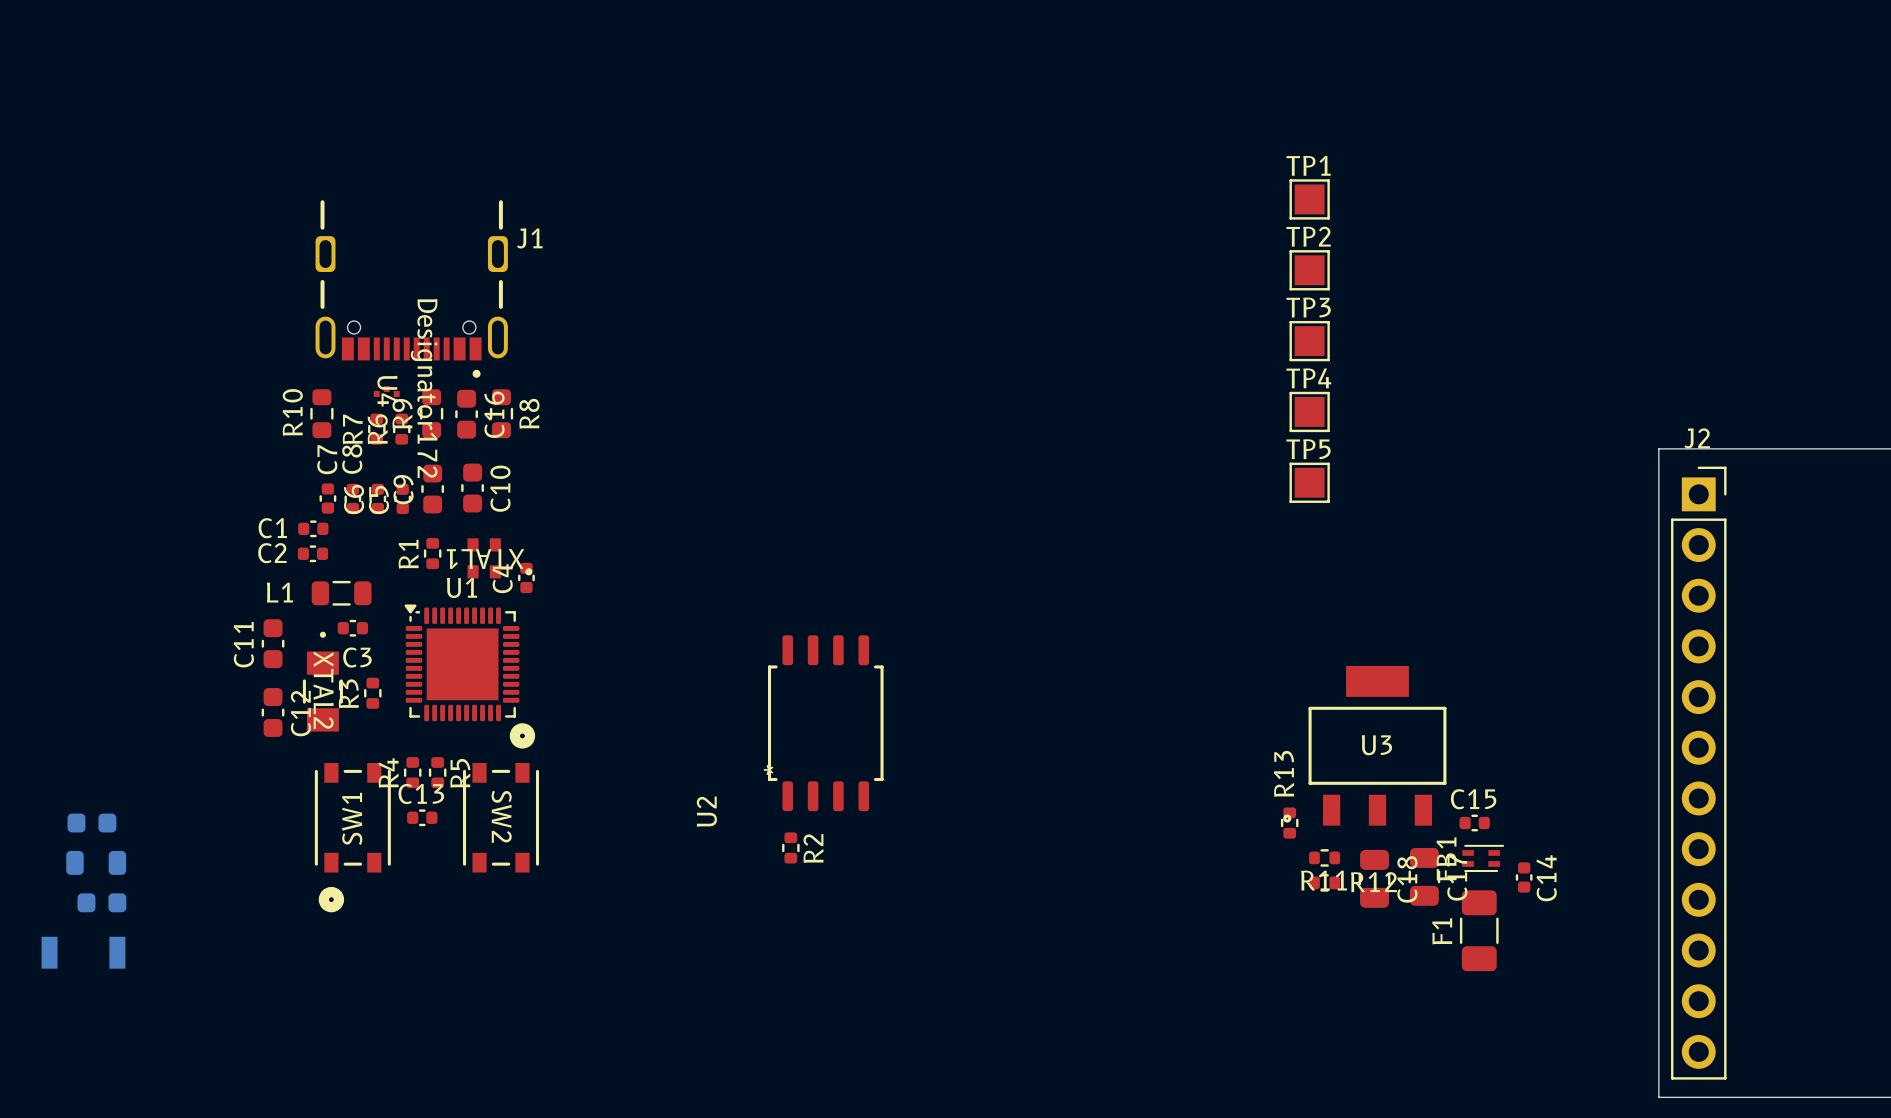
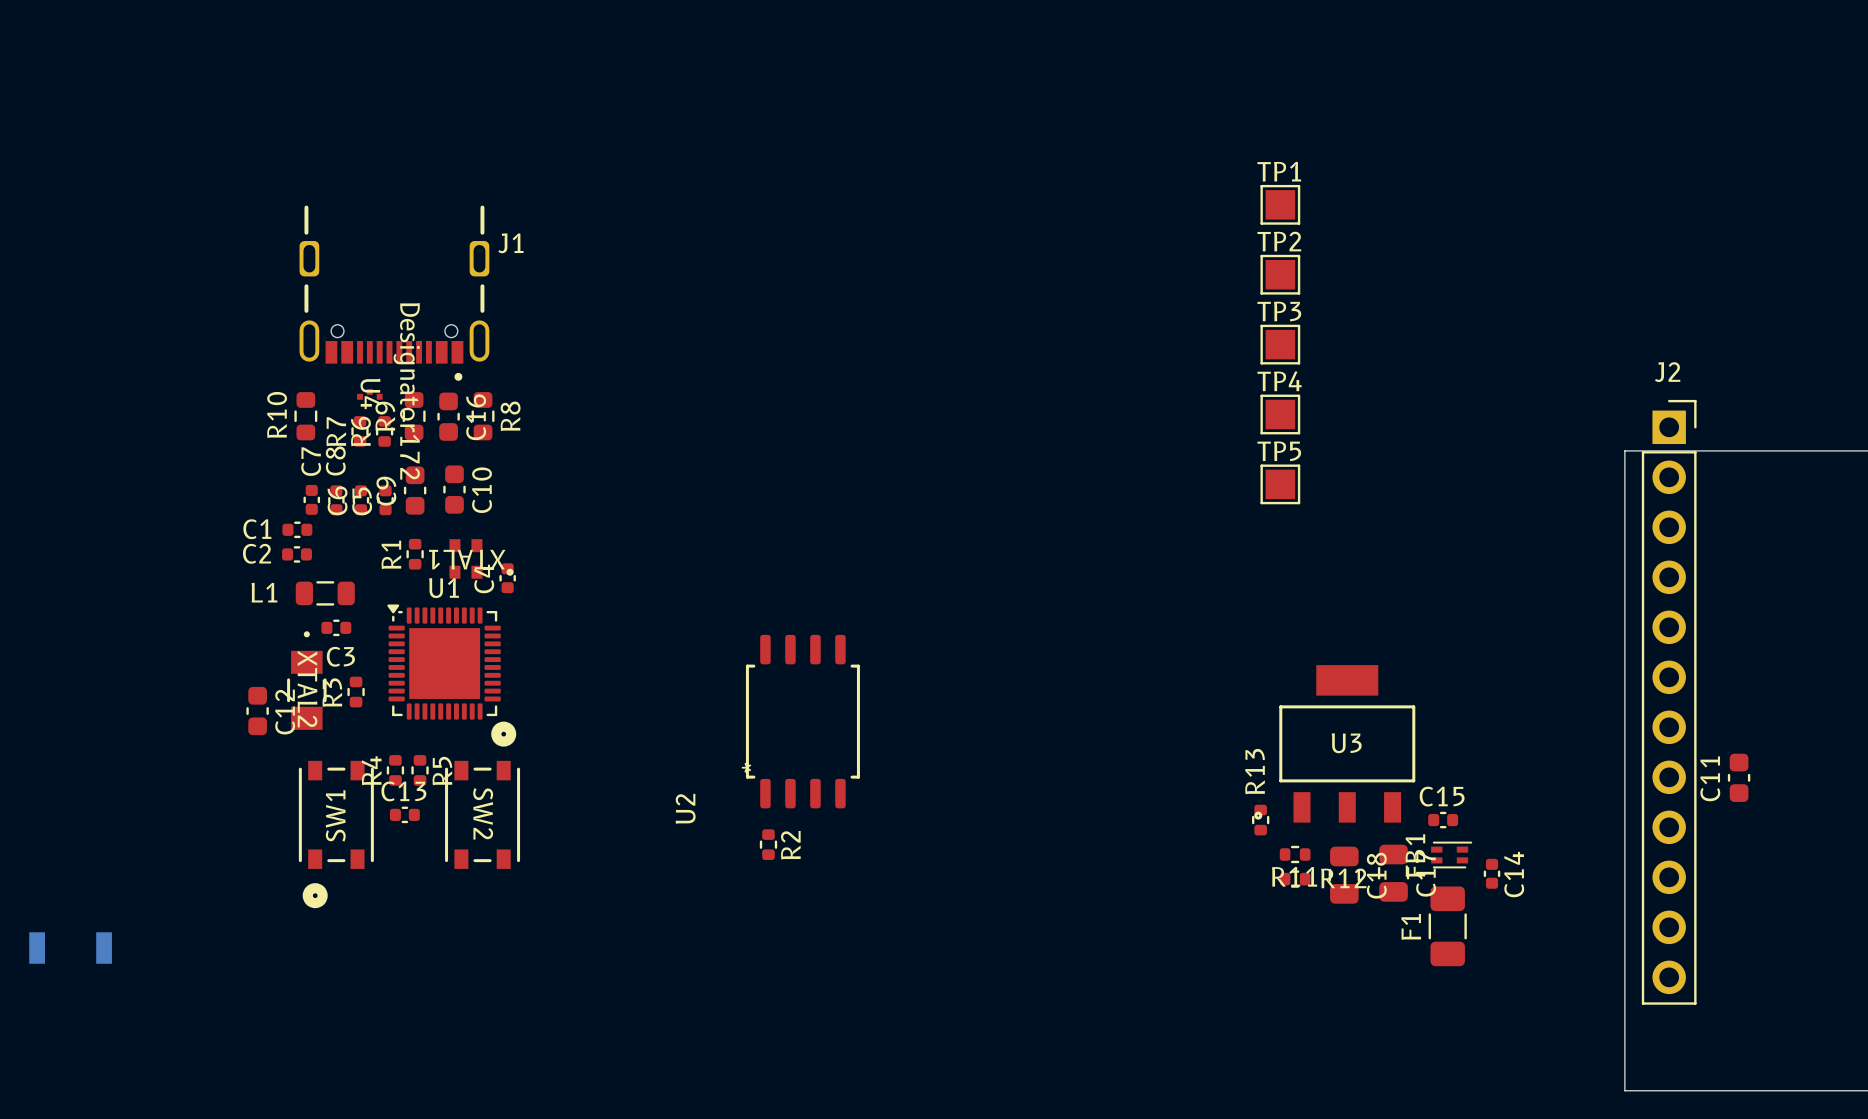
C11 position: (273, 643) -> (1739, 777)
J2 position: (1698, 773) -> (1669, 702)
part: (91, 823) -> none
part: (96, 862) -> none
part: (101, 902) -> none

